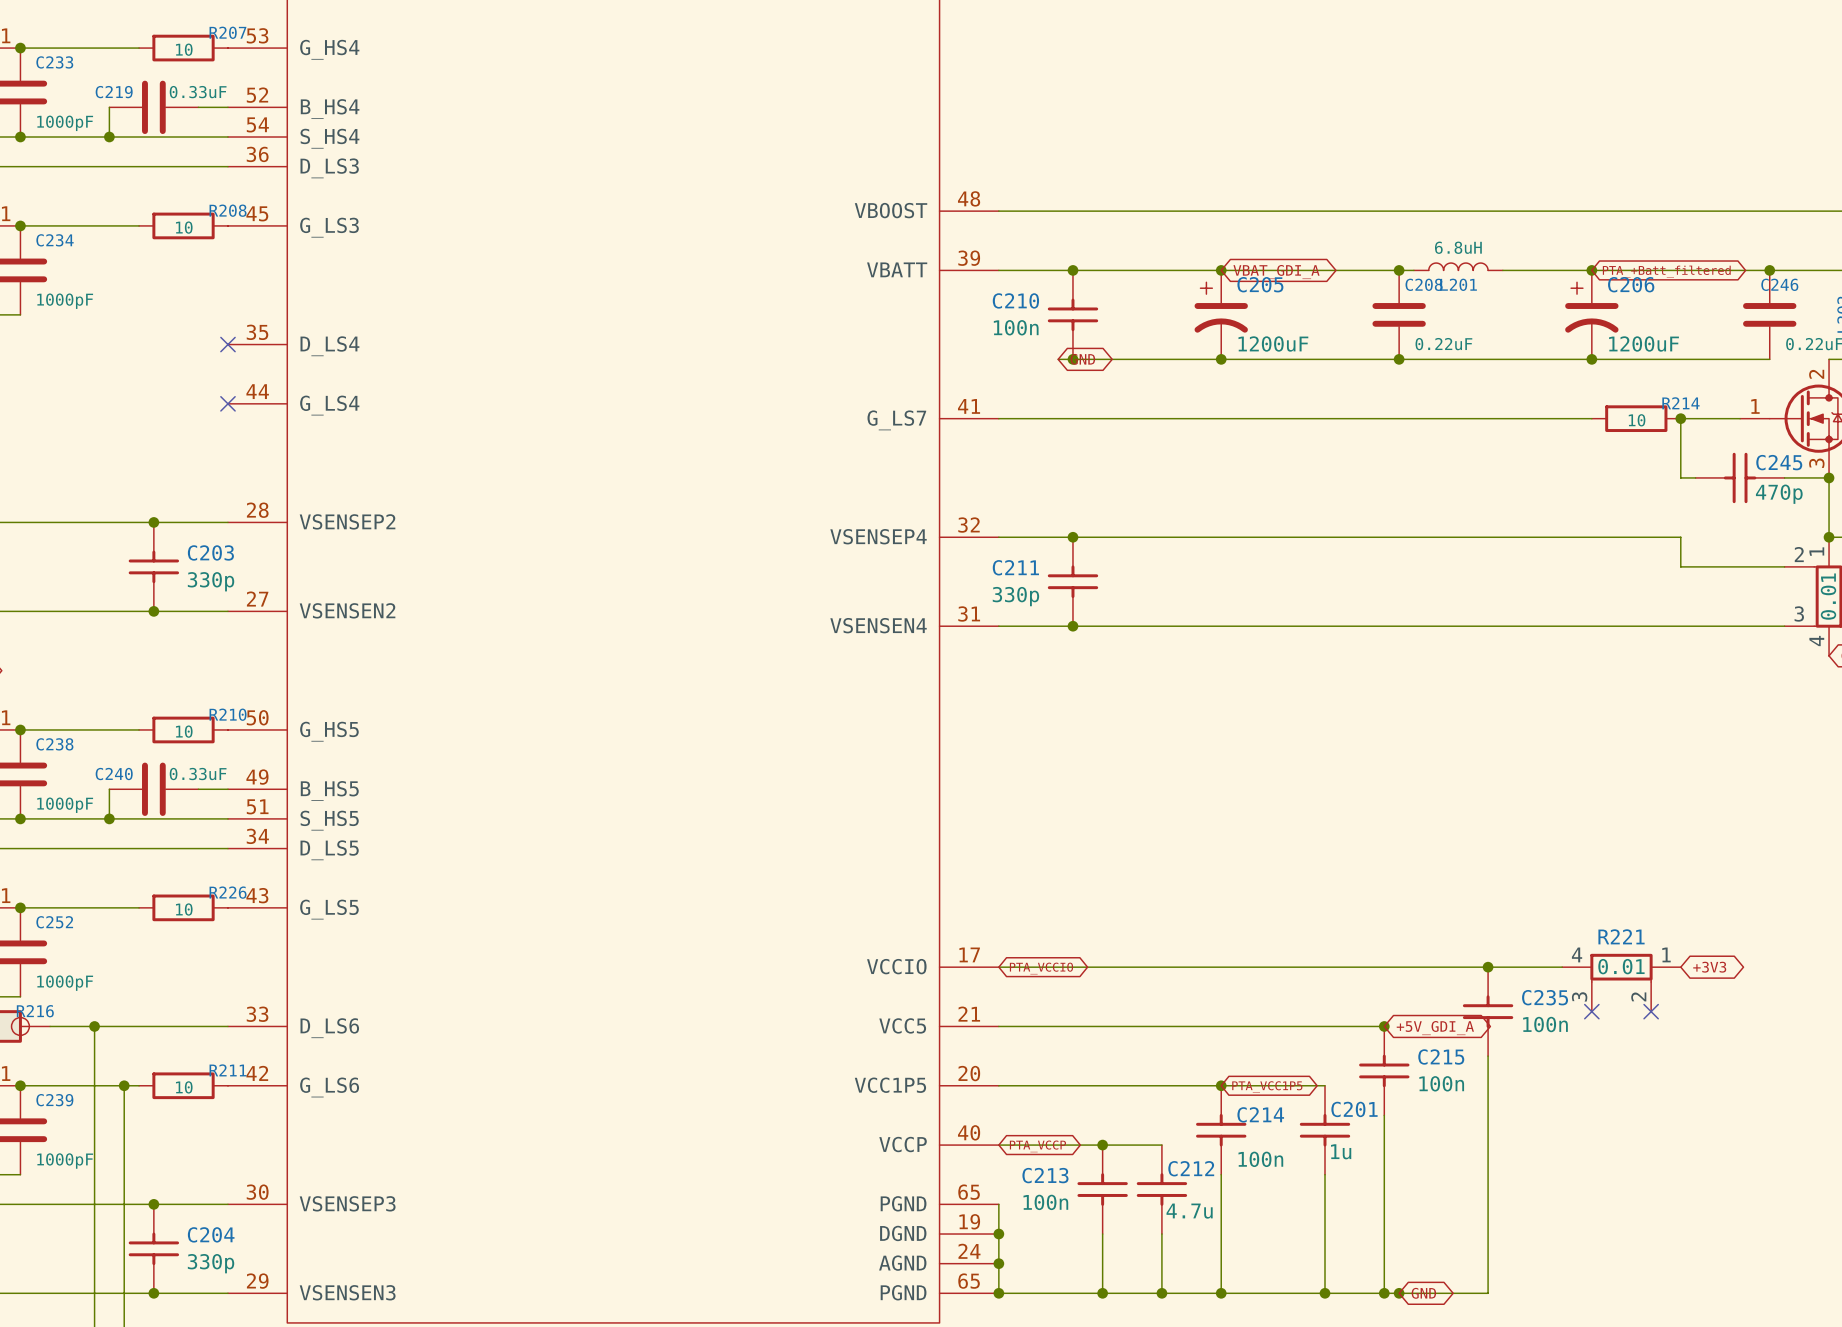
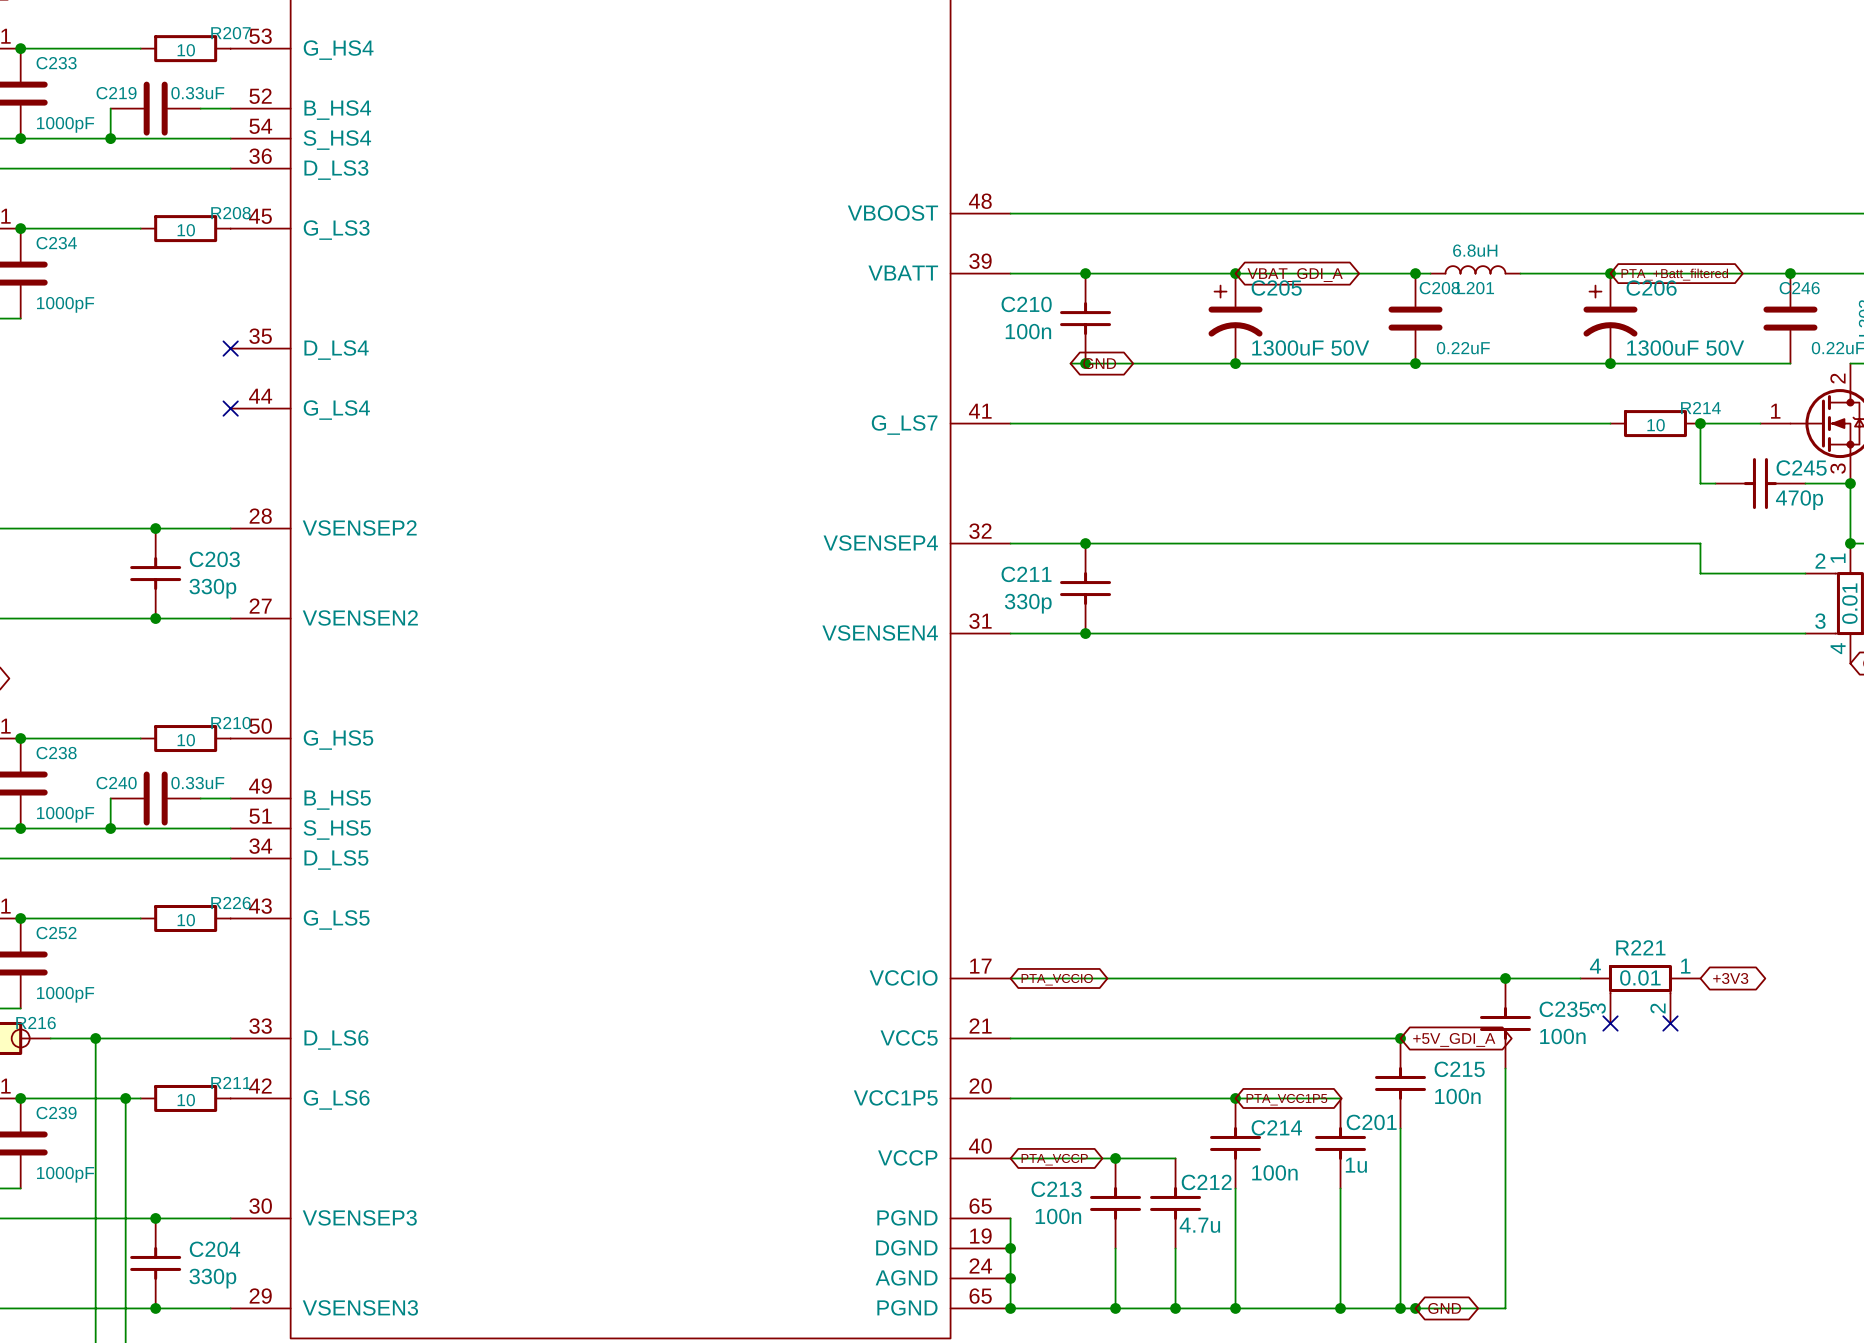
C205 value: 1200uF (1273, 344) -> 1300uF 50V (1310, 348)
C206 value: 1200uF (1644, 344) -> 1300uF 50V (1685, 348)

